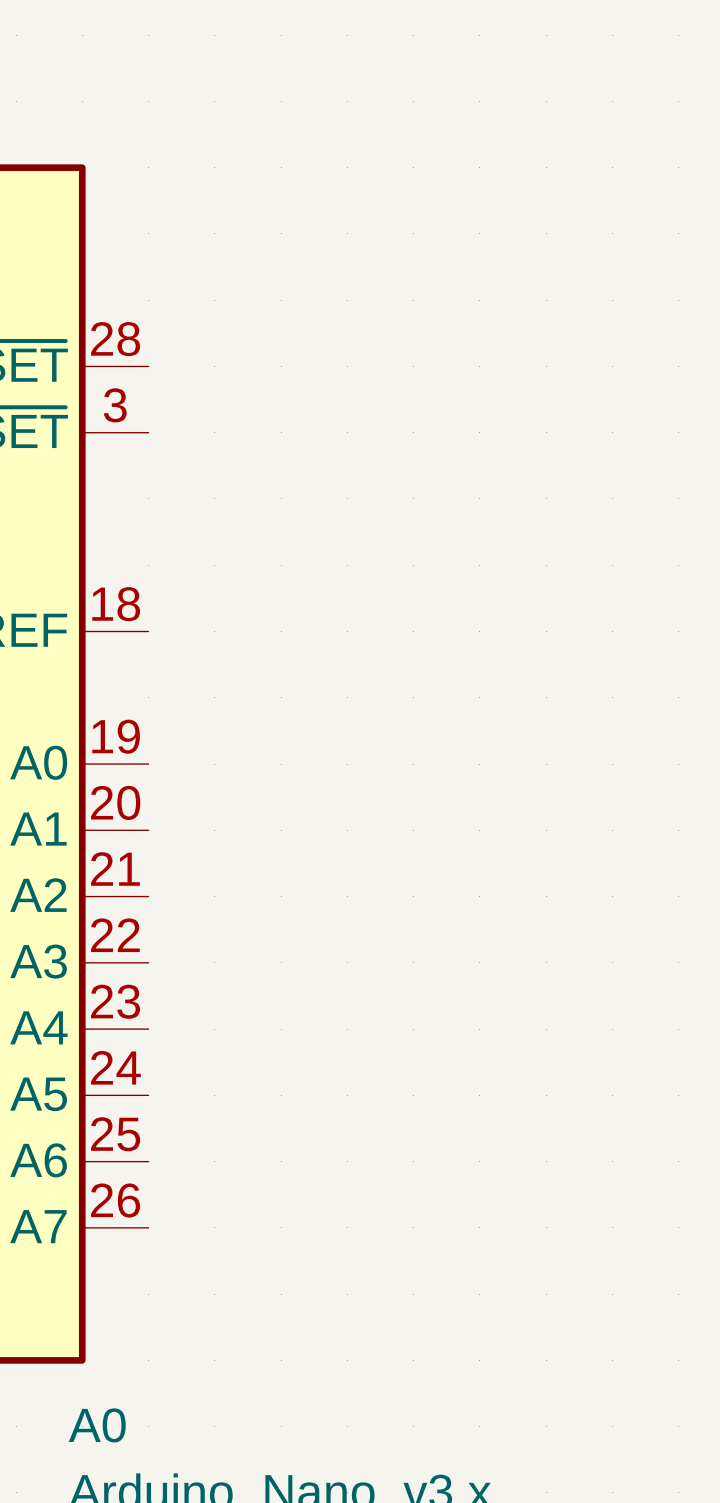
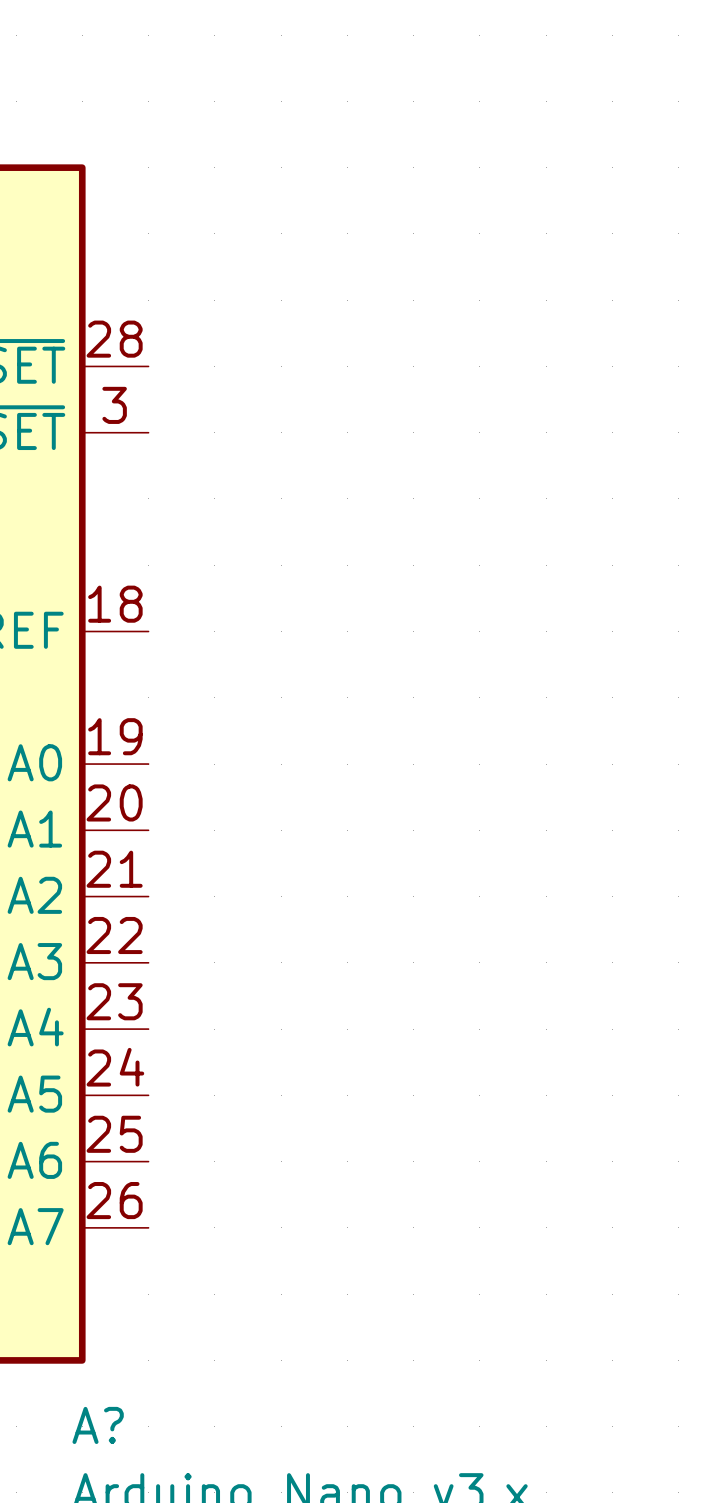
A0 name: A0 (97, 1425) -> A? (98, 1425)

